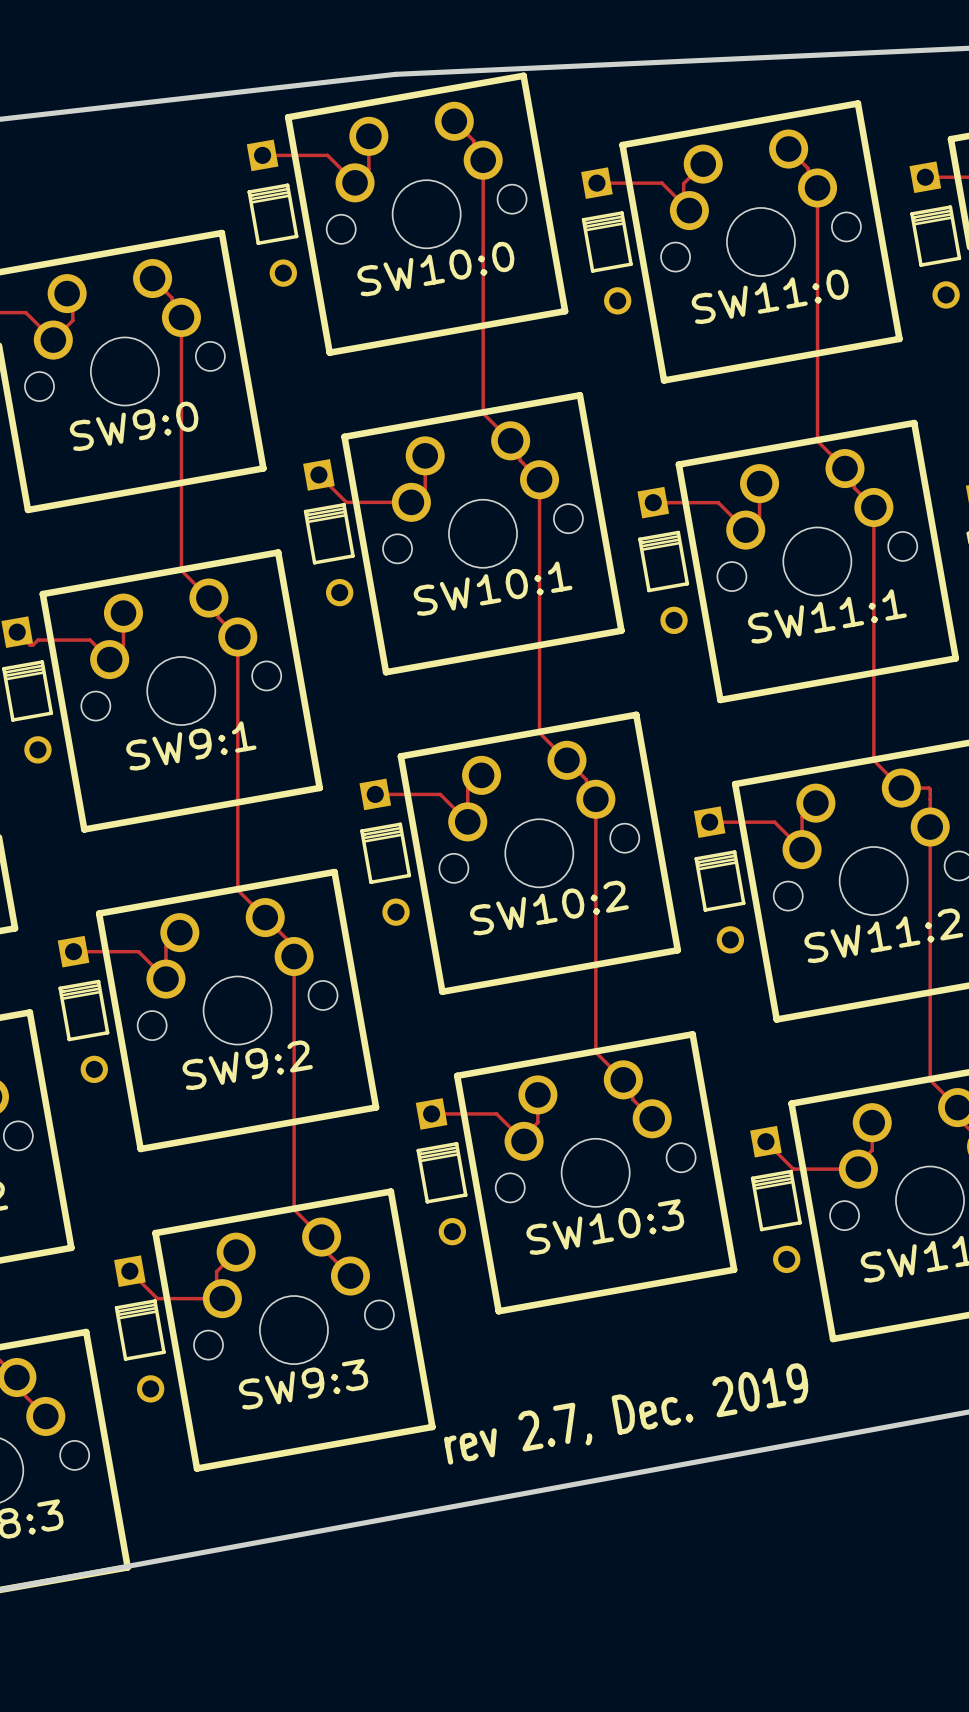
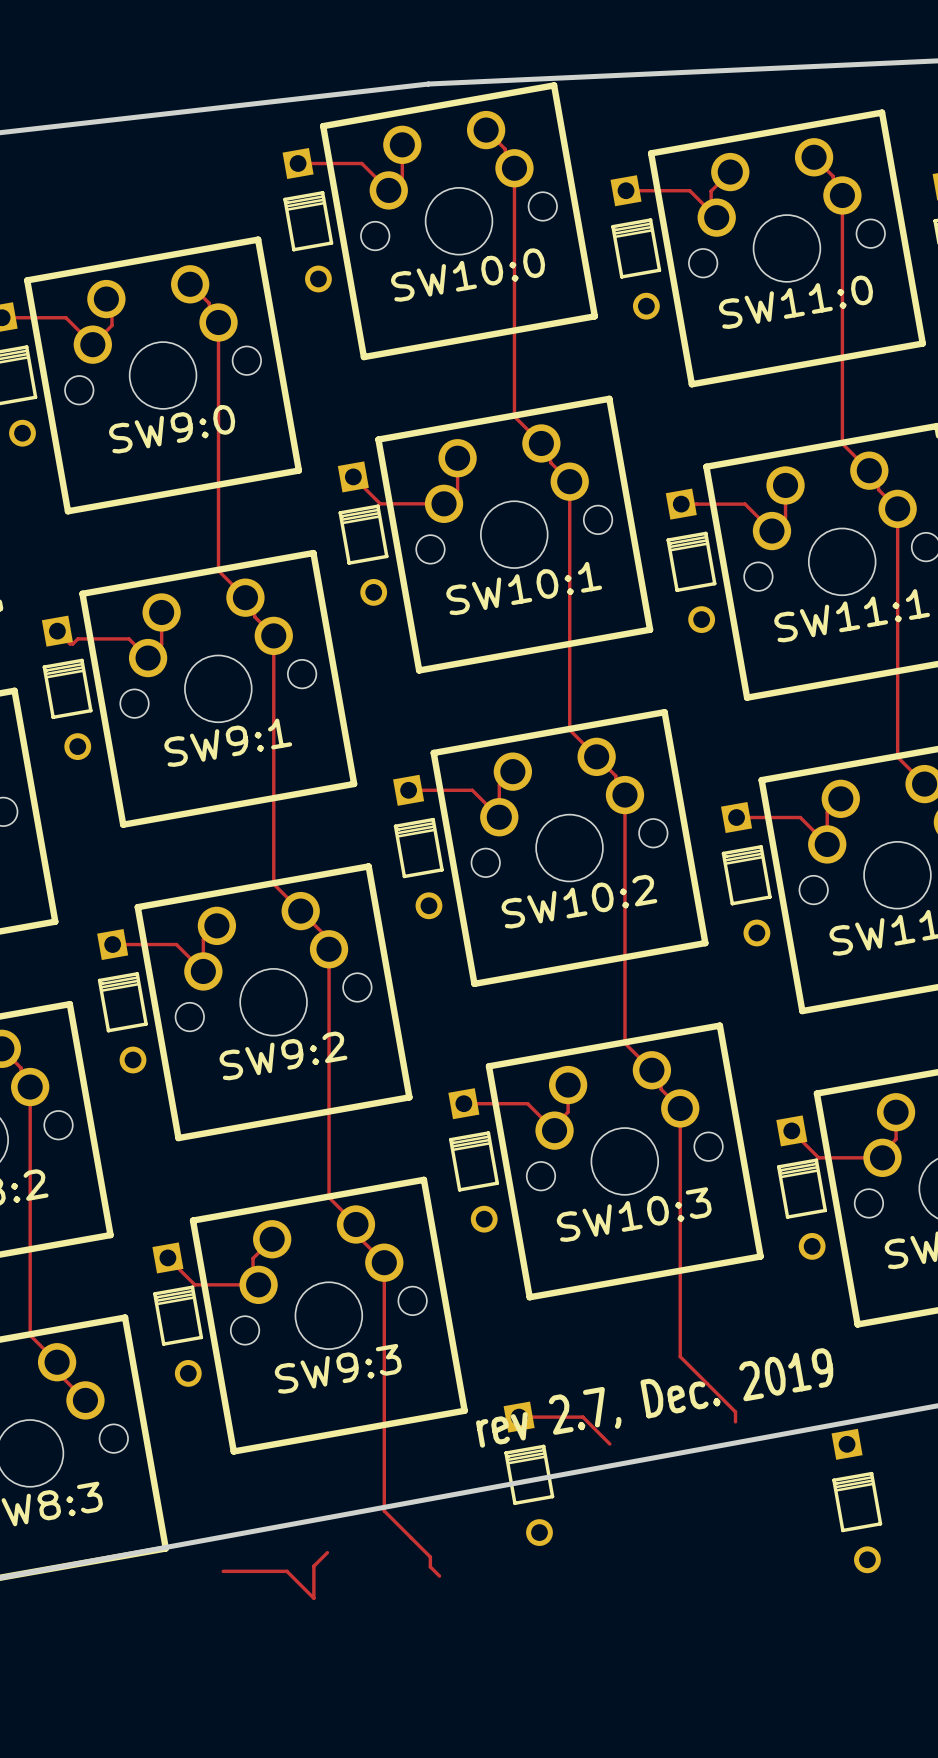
track: none -> (680, 1108) (680, 1356) (735, 1411) (735, 1421)
track: none -> (384, 1262) (384, 1510) (430, 1557) (430, 1566) (439, 1576)
track: none -> (519, 1417) (582, 1417) (609, 1444)
part: none -> (528, 1473)
part: none -> (856, 1500)
track: none -> (327, 1552) (313, 1566) (313, 1598) (286, 1571) (223, 1571)

